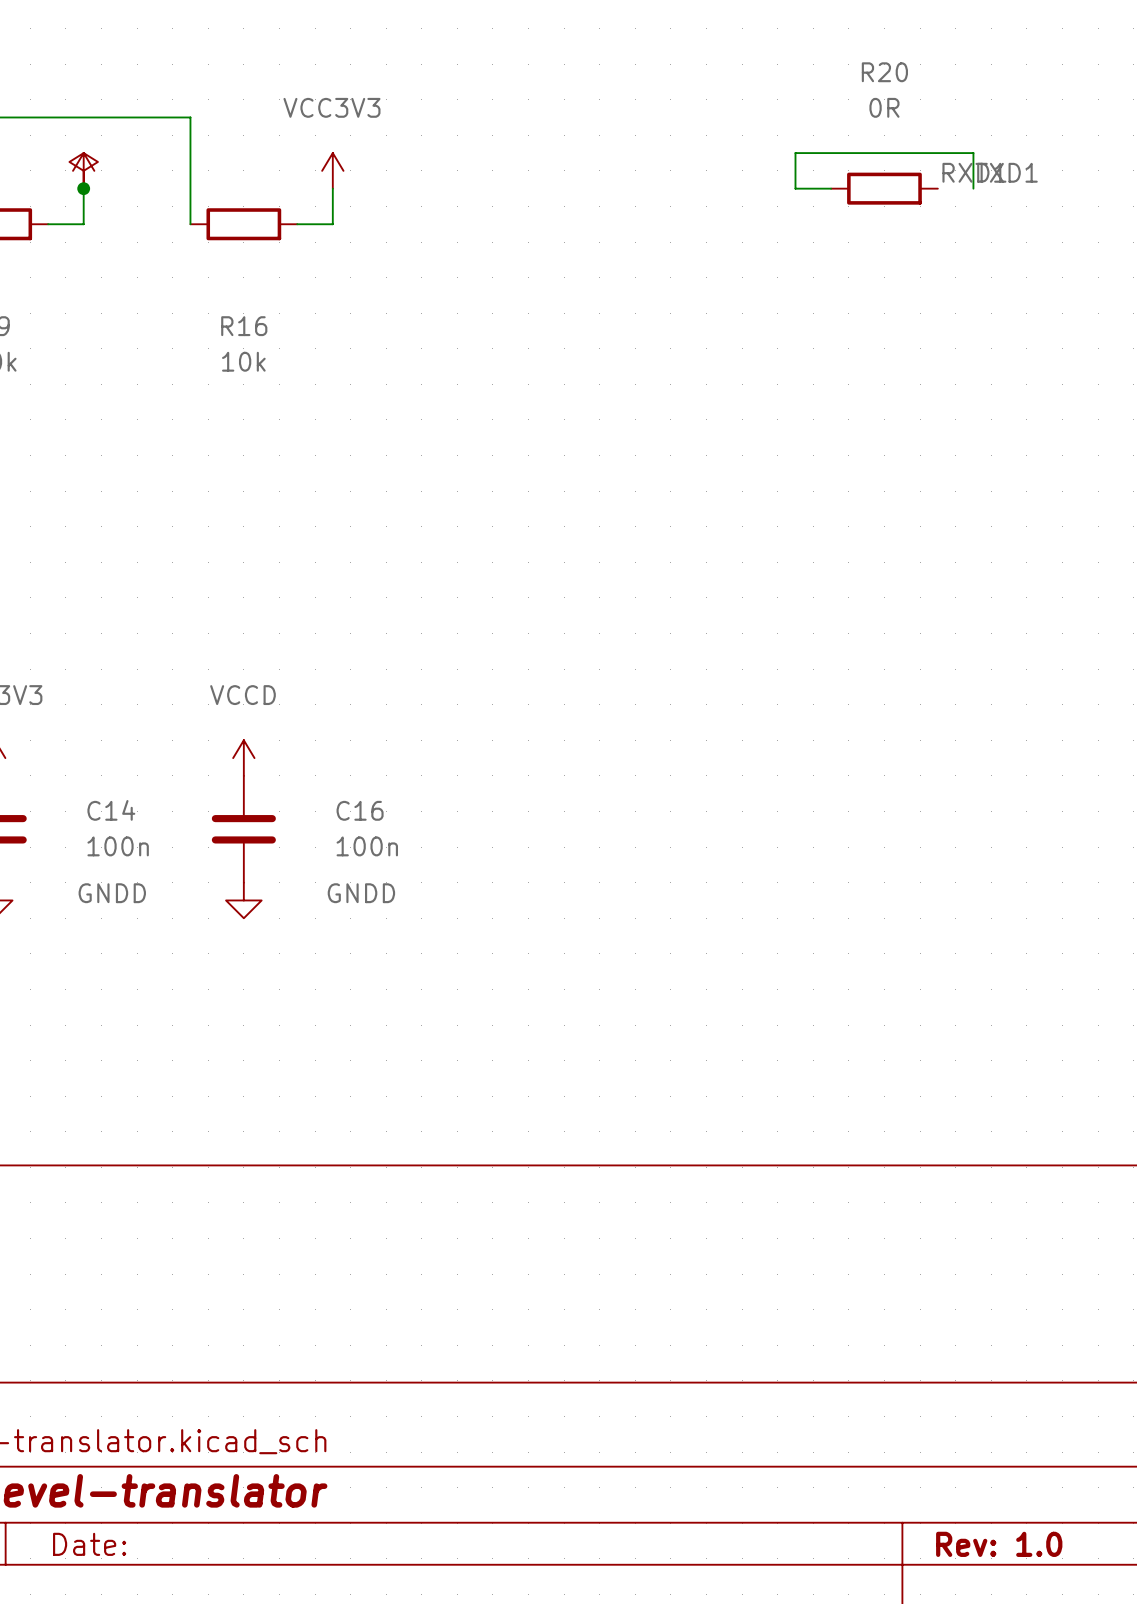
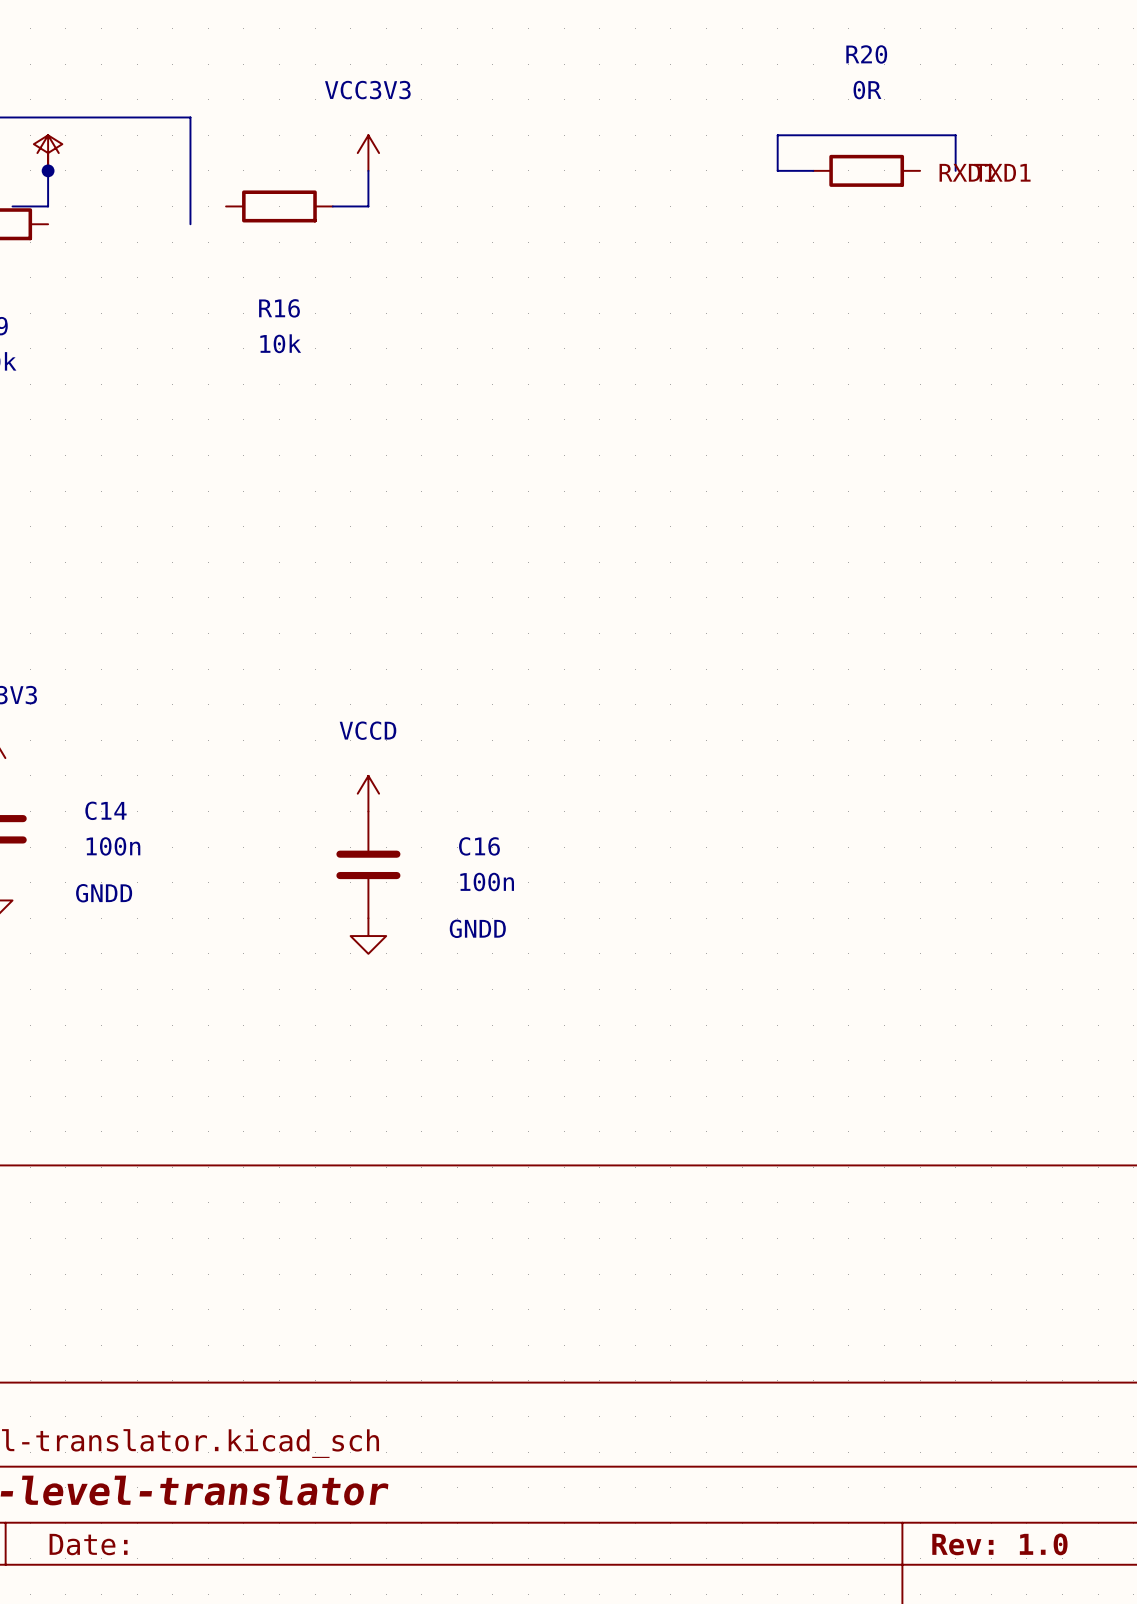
power symbol position: (83, 170) -> (48, 153)
power symbol position: (83, 170) -> (48, 153)
power symbol position: VCC3V3 (332, 170) -> VCC3V3 (368, 153)
wire: (83, 188) (83, 224) (48, 224) -> (48, 170) (48, 206) (12, 206)
junction position: (83, 188) -> (48, 170)
wire: (332, 188) (332, 224) (297, 224) -> (368, 170) (368, 206) (332, 206)
wire: (831, 188) (795, 188) (795, 153) (973, 153) (973, 188) -> (813, 170) (777, 170) (777, 135) (955, 135) (955, 170)
R20 position: (884, 188) -> (866, 170)
R16 position: (243, 224) -> (279, 206)
power symbol position: VCCD (243, 758) -> VCCD (368, 793)
C16 position: (243, 829) -> (368, 864)
power symbol position: GNDD (243, 900) -> GNDD (368, 936)

